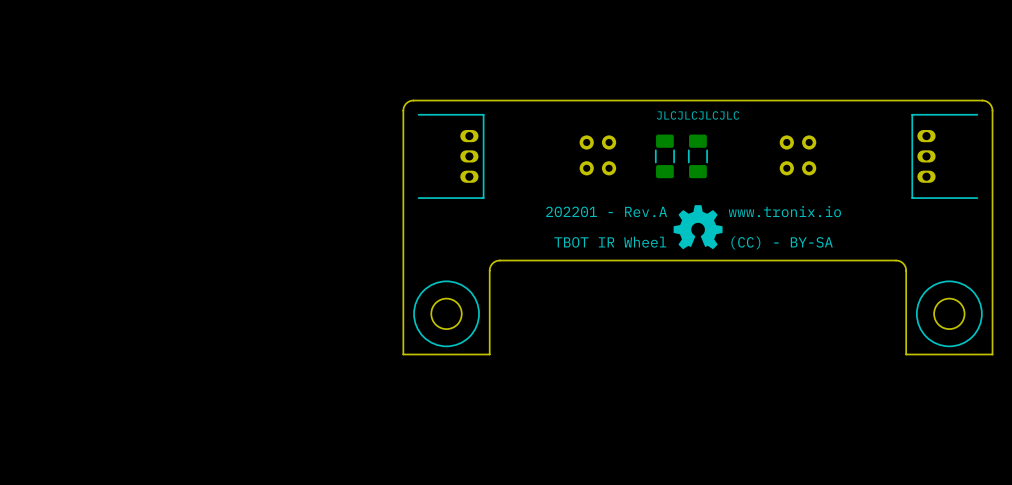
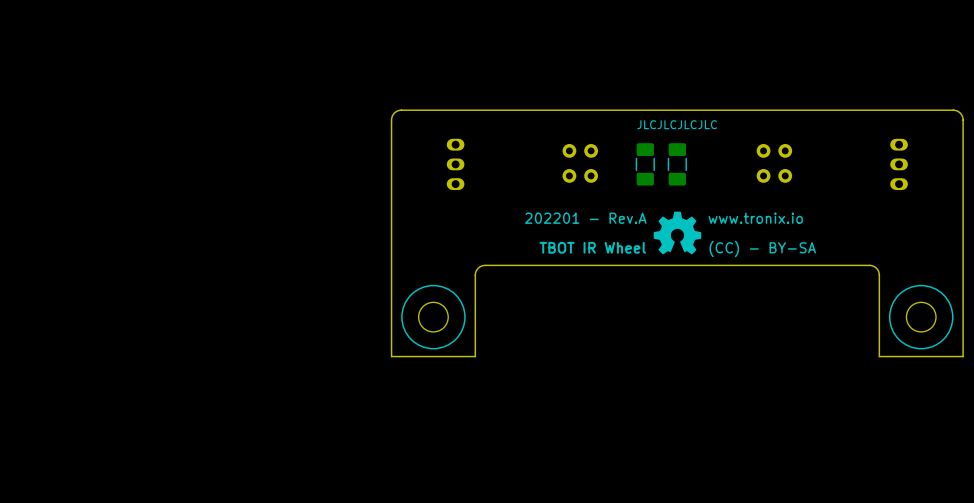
part side: bottom (451, 156) -> top (455, 164)
part side: bottom (944, 156) -> top (899, 164)

